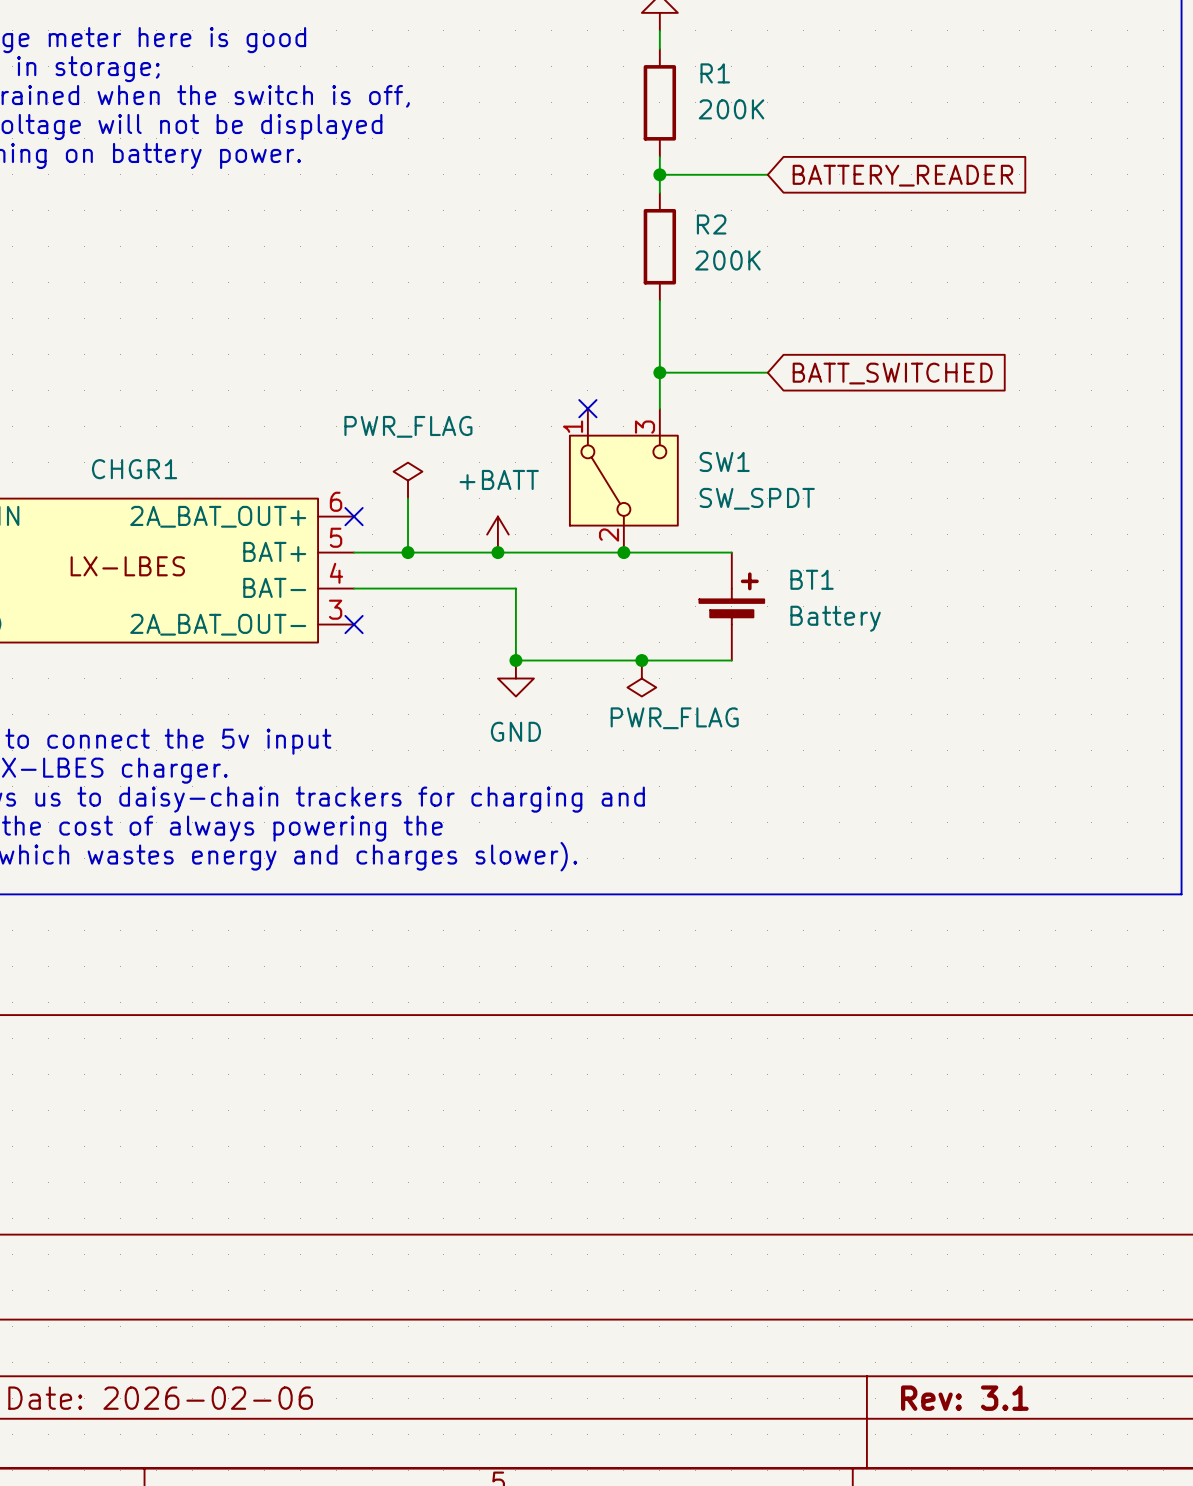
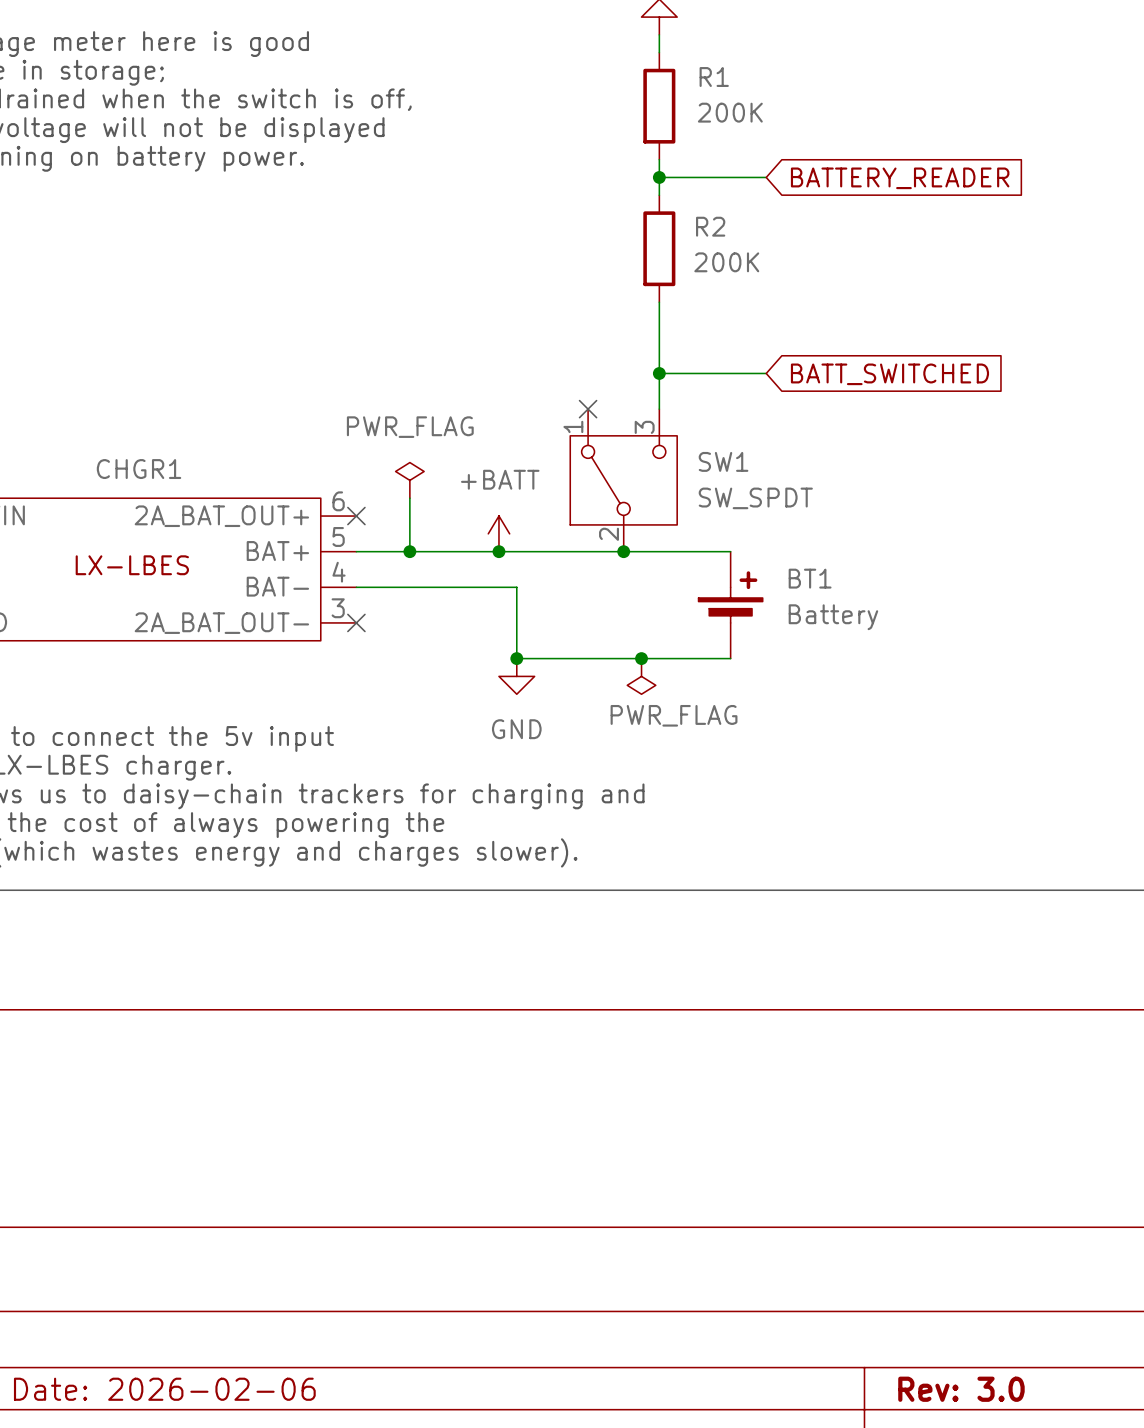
title block: Rev: 3.1 (964, 1398) -> Rev: 3.0 (961, 1389)

